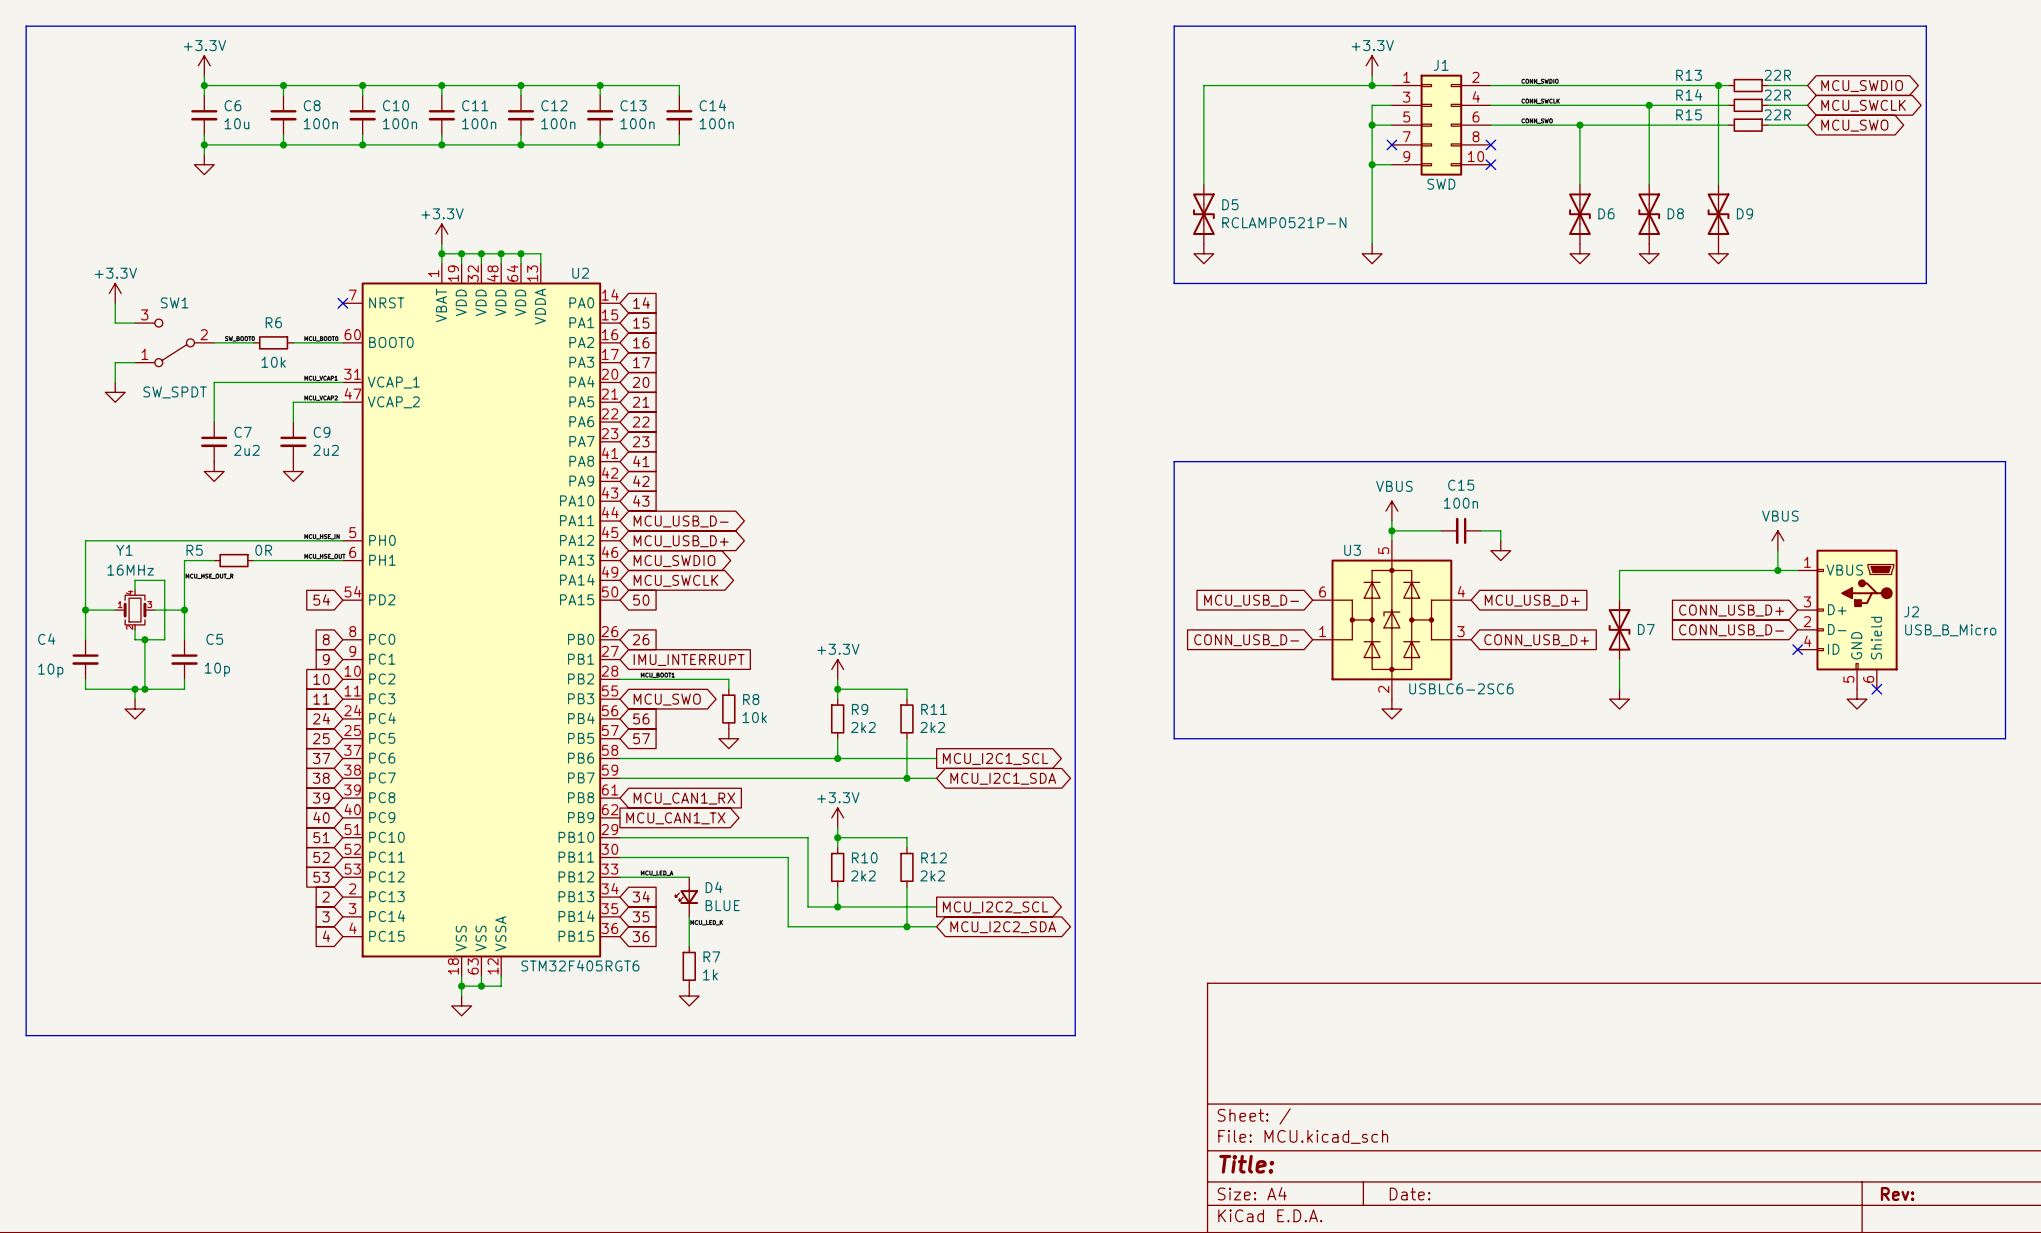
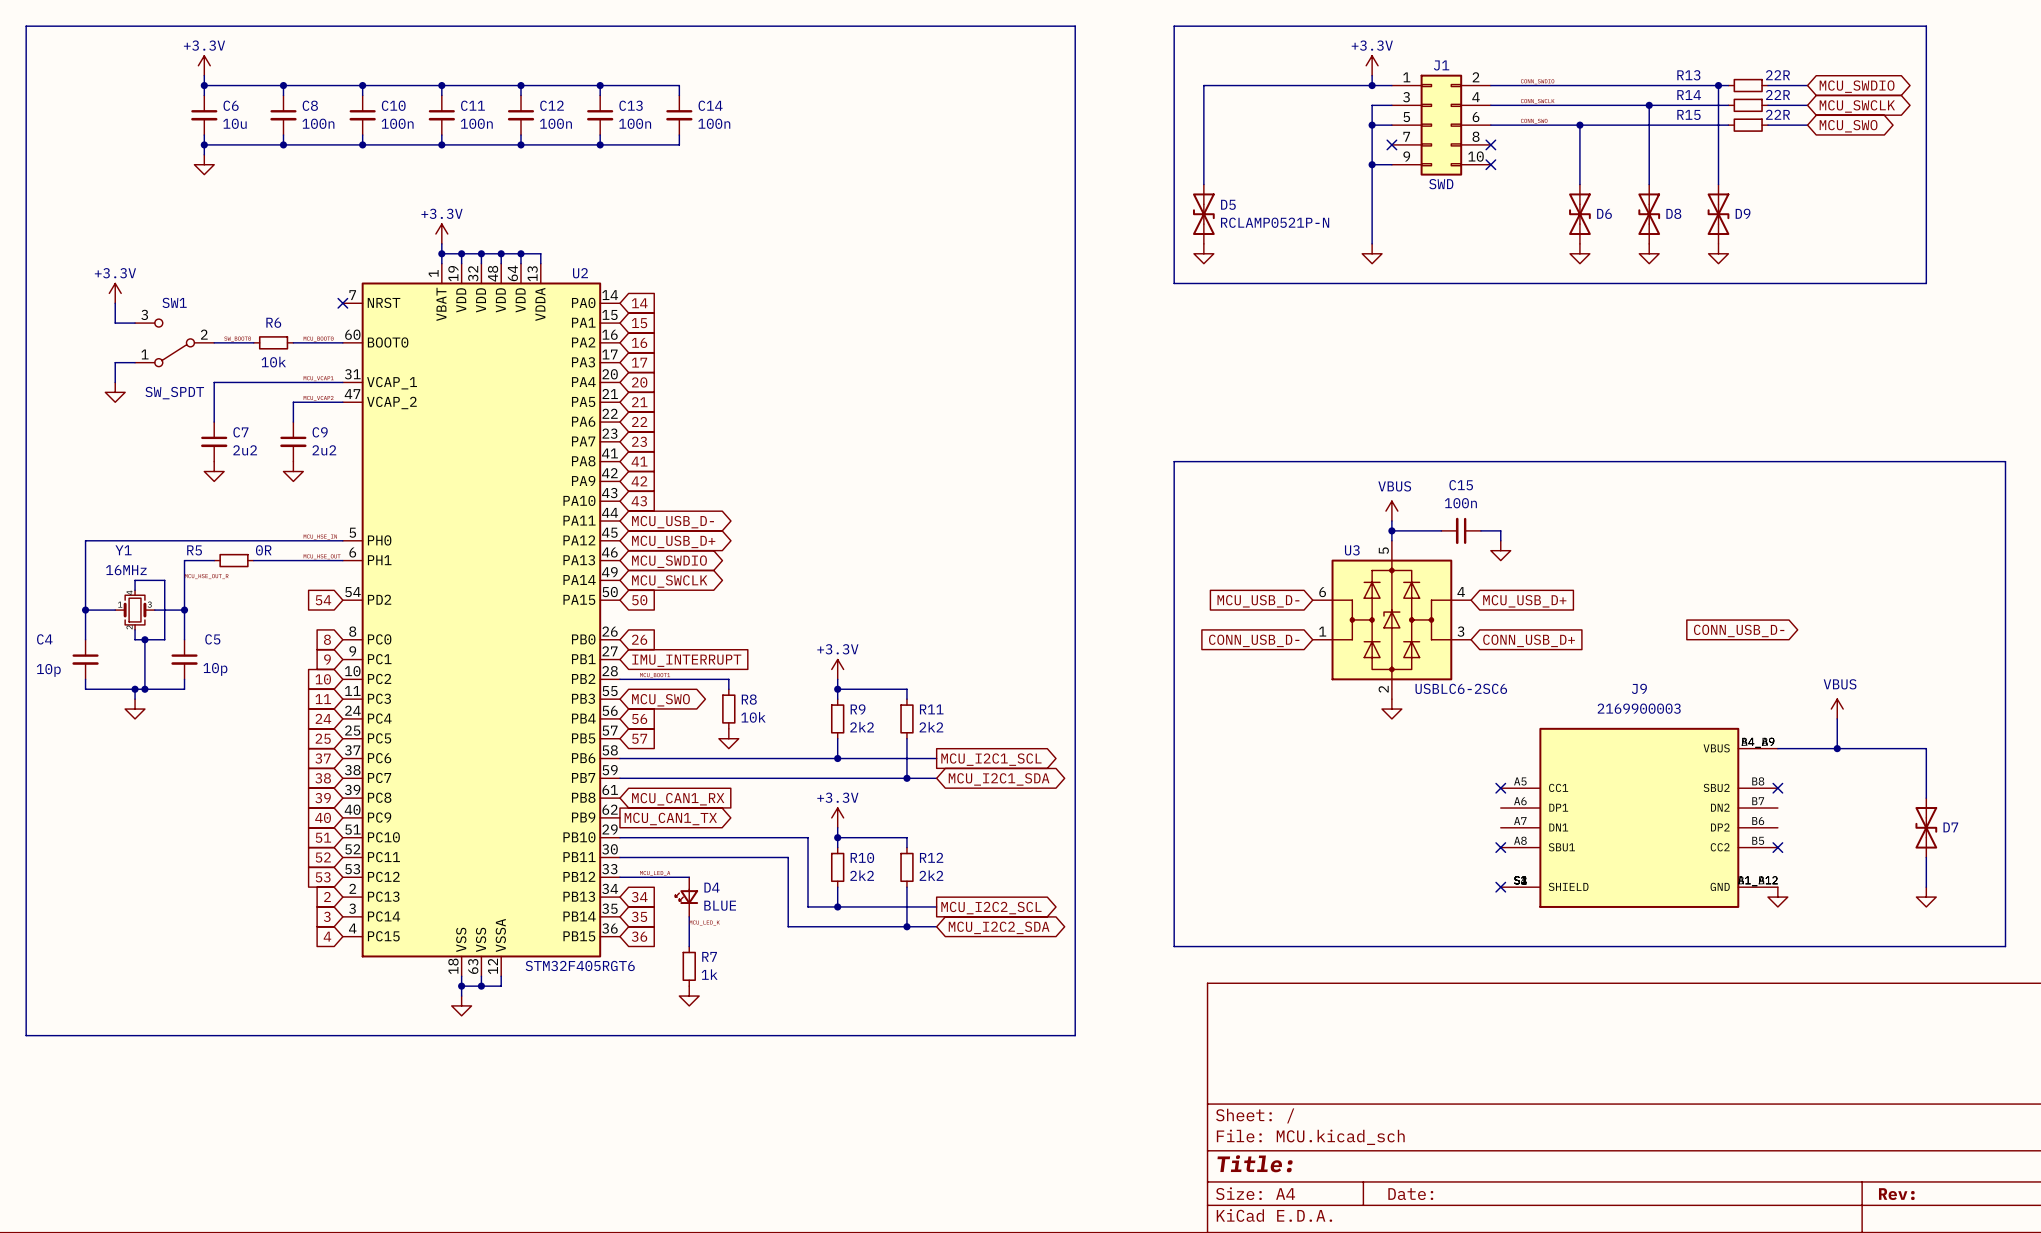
power symbol position: VBUS (1777, 540) -> VBUS (1837, 709)
wire: (1777, 550) (1777, 570) -> none
junction: (1777, 570) -> none
wire: (1797, 570) (1619, 570) (1619, 600) -> none
global label: CONN_USB_D+ (1731, 610) -> none
J2: USB_B_Micro (1847, 619) -> none
D7 position: (1619, 629) -> (1926, 827)
no-connect mark: (1797, 649) -> none
wire: (1619, 659) (1619, 689) -> none
no-connect mark: (1876, 689) -> none
power symbol: (1619, 699) -> none
power symbol: (1857, 699) -> none
wire: none -> (1837, 718) (1837, 748)
line: (1174, 738) (2005, 738) -> (1174, 738) (1174, 946) (2005, 946) (2005, 738)
wire: none -> (1777, 748) (1926, 748) (1926, 798)
junction: none -> (1837, 748)
no-connect mark: none -> (1500, 788)
no-connect mark: none -> (1777, 788)
J9: none -> 2169900003 (1639, 817)
no-connect mark: none -> (1500, 847)
no-connect mark: none -> (1777, 847)
wire: none -> (1926, 857) (1926, 887)
no-connect mark: none -> (1500, 887)
power symbol: none -> (1777, 897)
power symbol: none -> (1926, 897)

